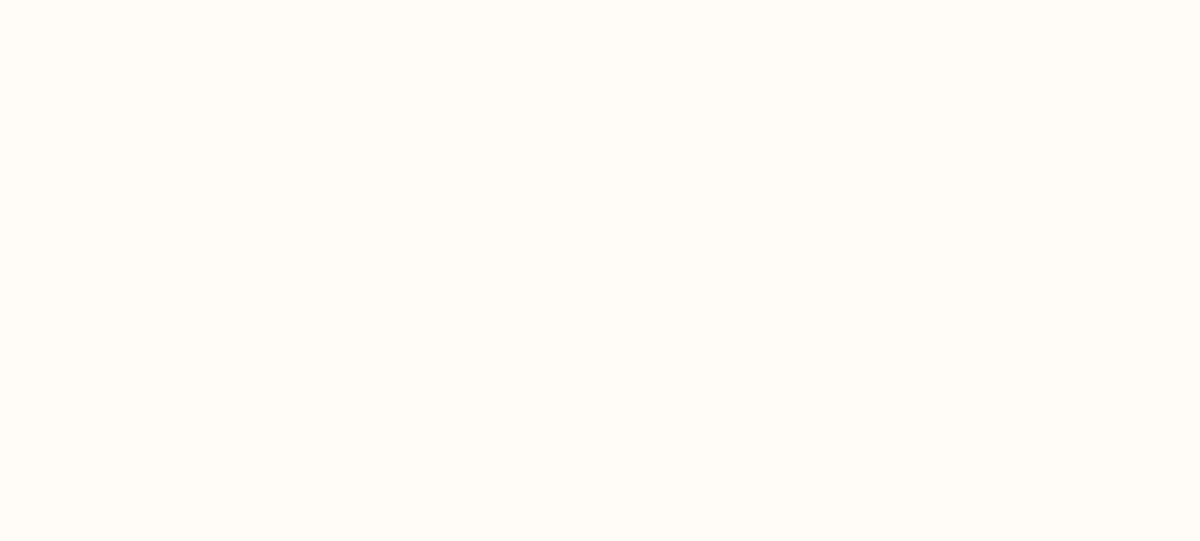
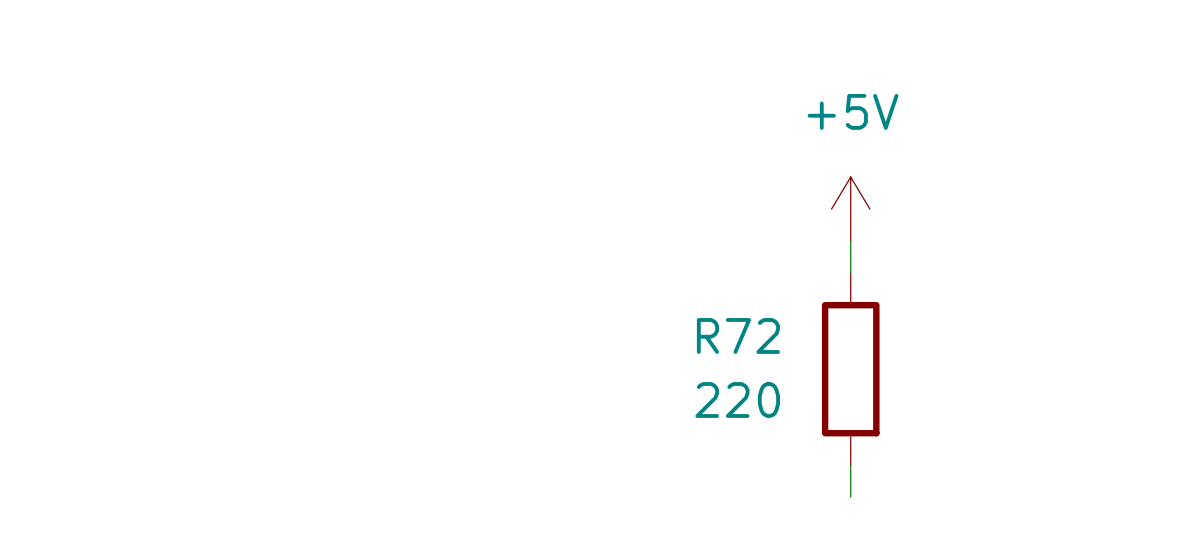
power symbol: none -> +5V (850, 209)
wire: none -> (850, 241) (850, 273)
R72: none -> 220 (850, 369)
wire: none -> (850, 465) (850, 497)

